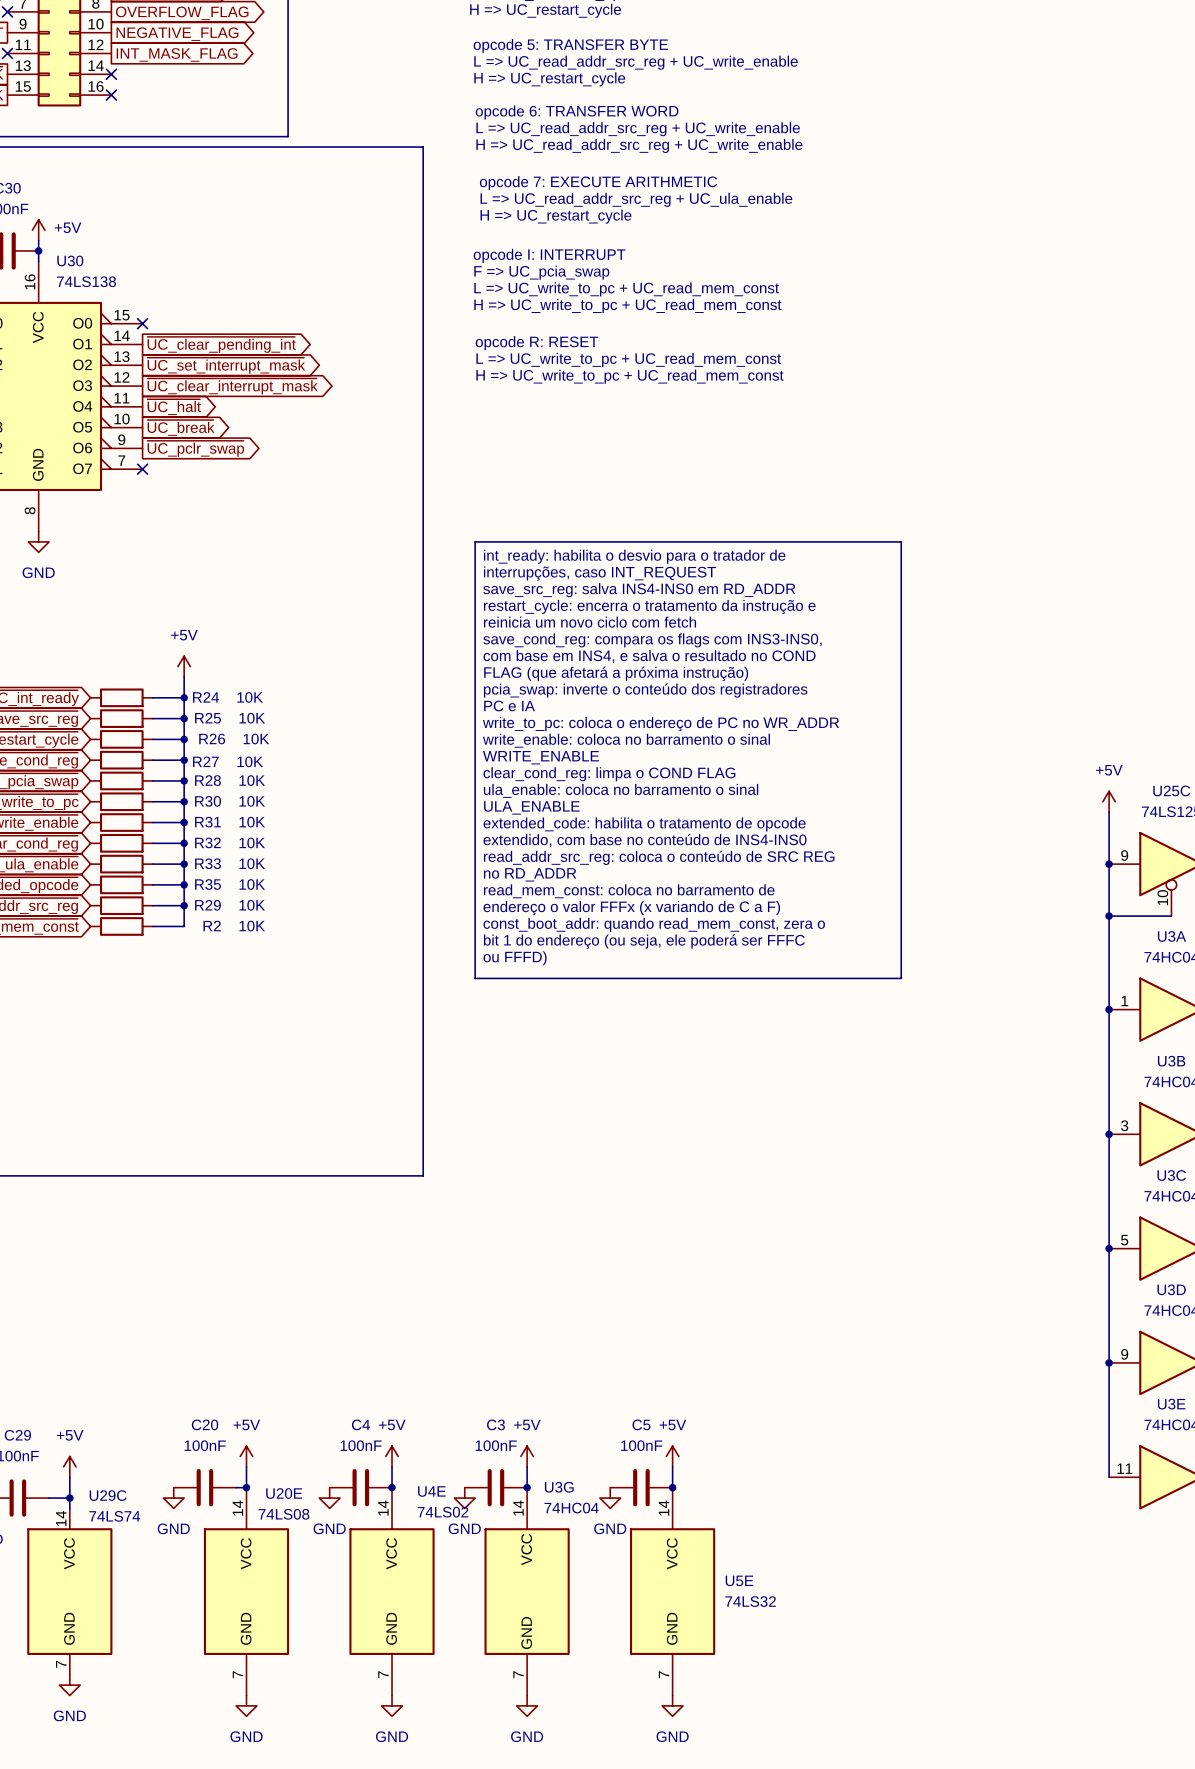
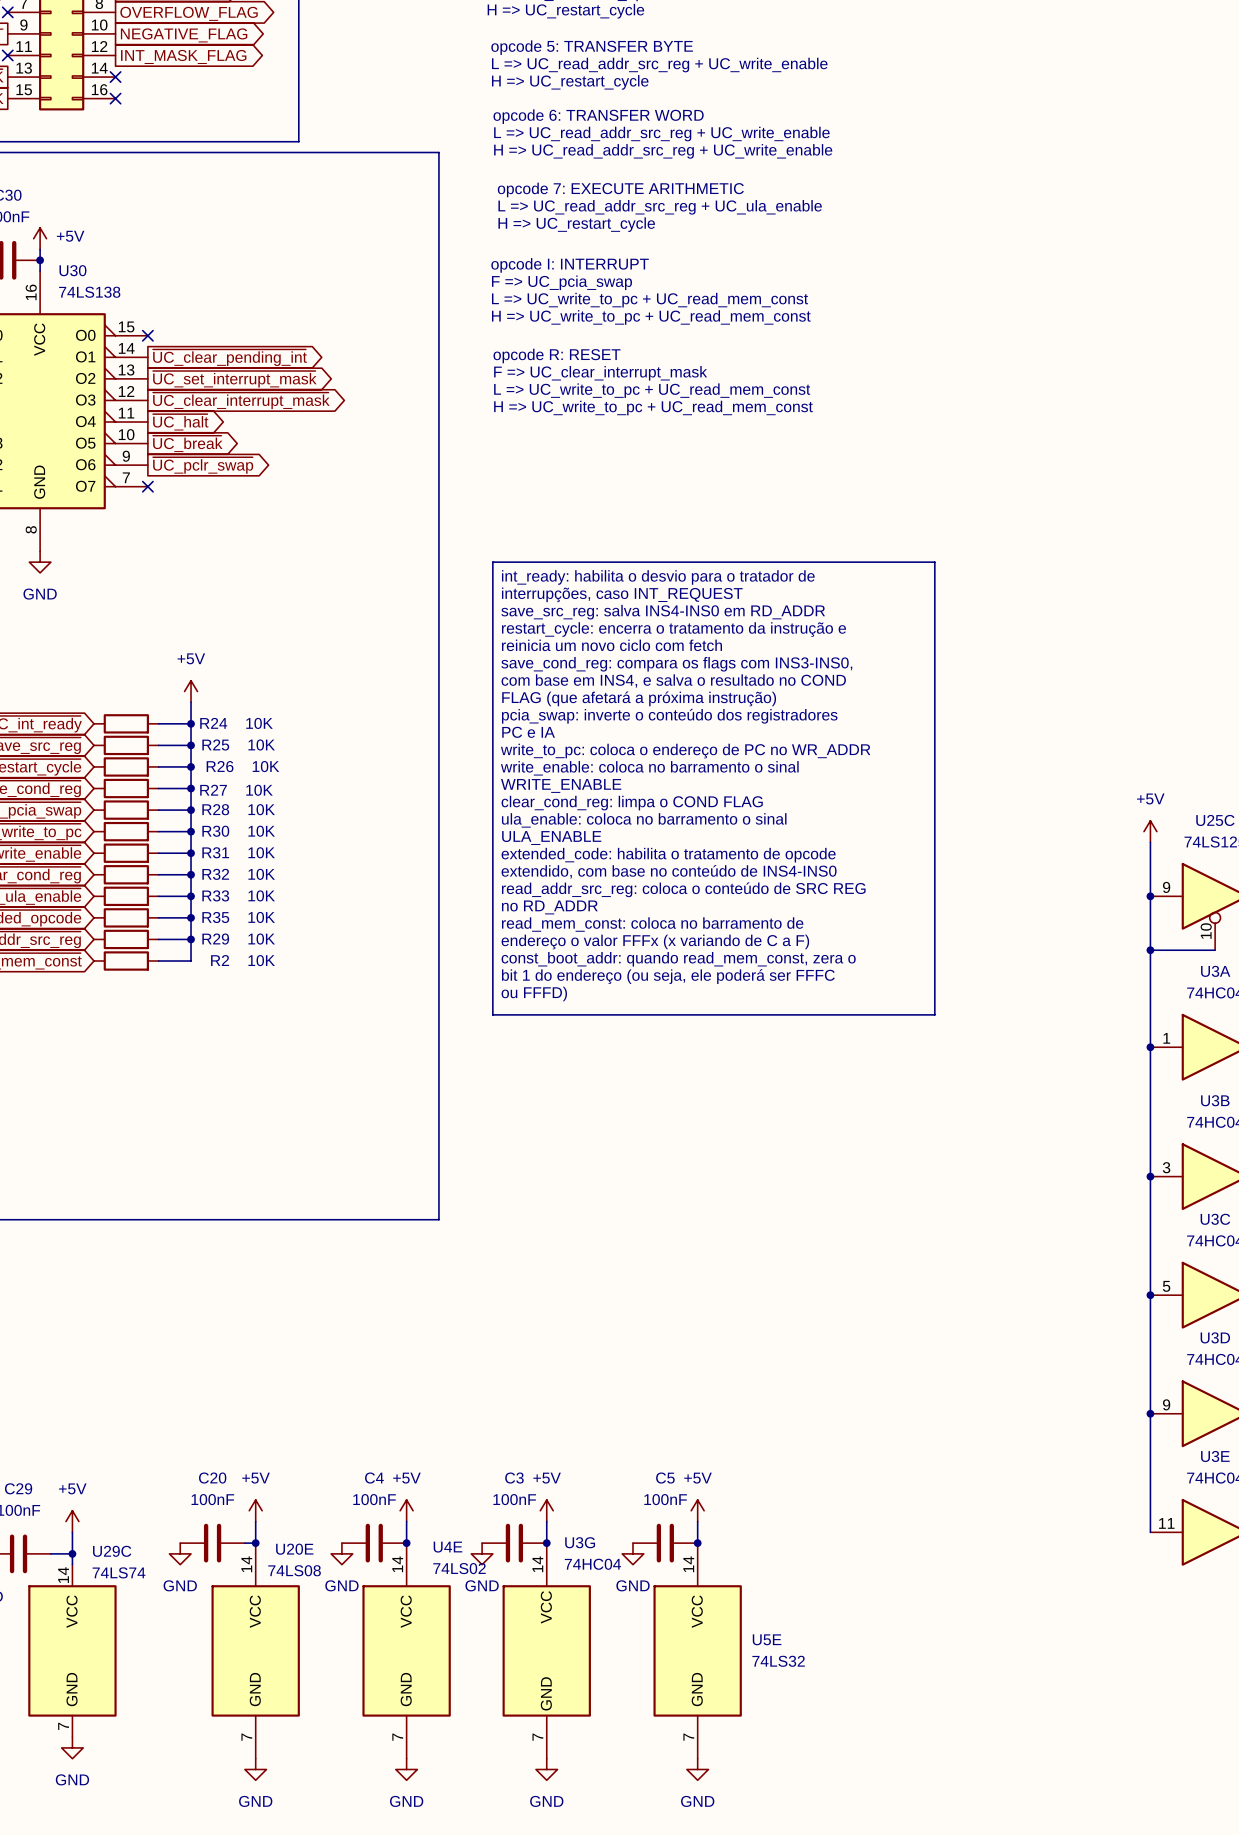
text: L => UC_write_to_pc + UC_read_mem_const (628, 359) -> F => UC_clear_interrupt_mask (600, 373)
text: H => UC_write_to_pc + UC_read_mem_const (629, 376) -> L => UC_write_to_pc + UC_read_mem_const (652, 390)
text: none -> H => UC_write_to_pc + UC_read_mem_const (653, 408)

